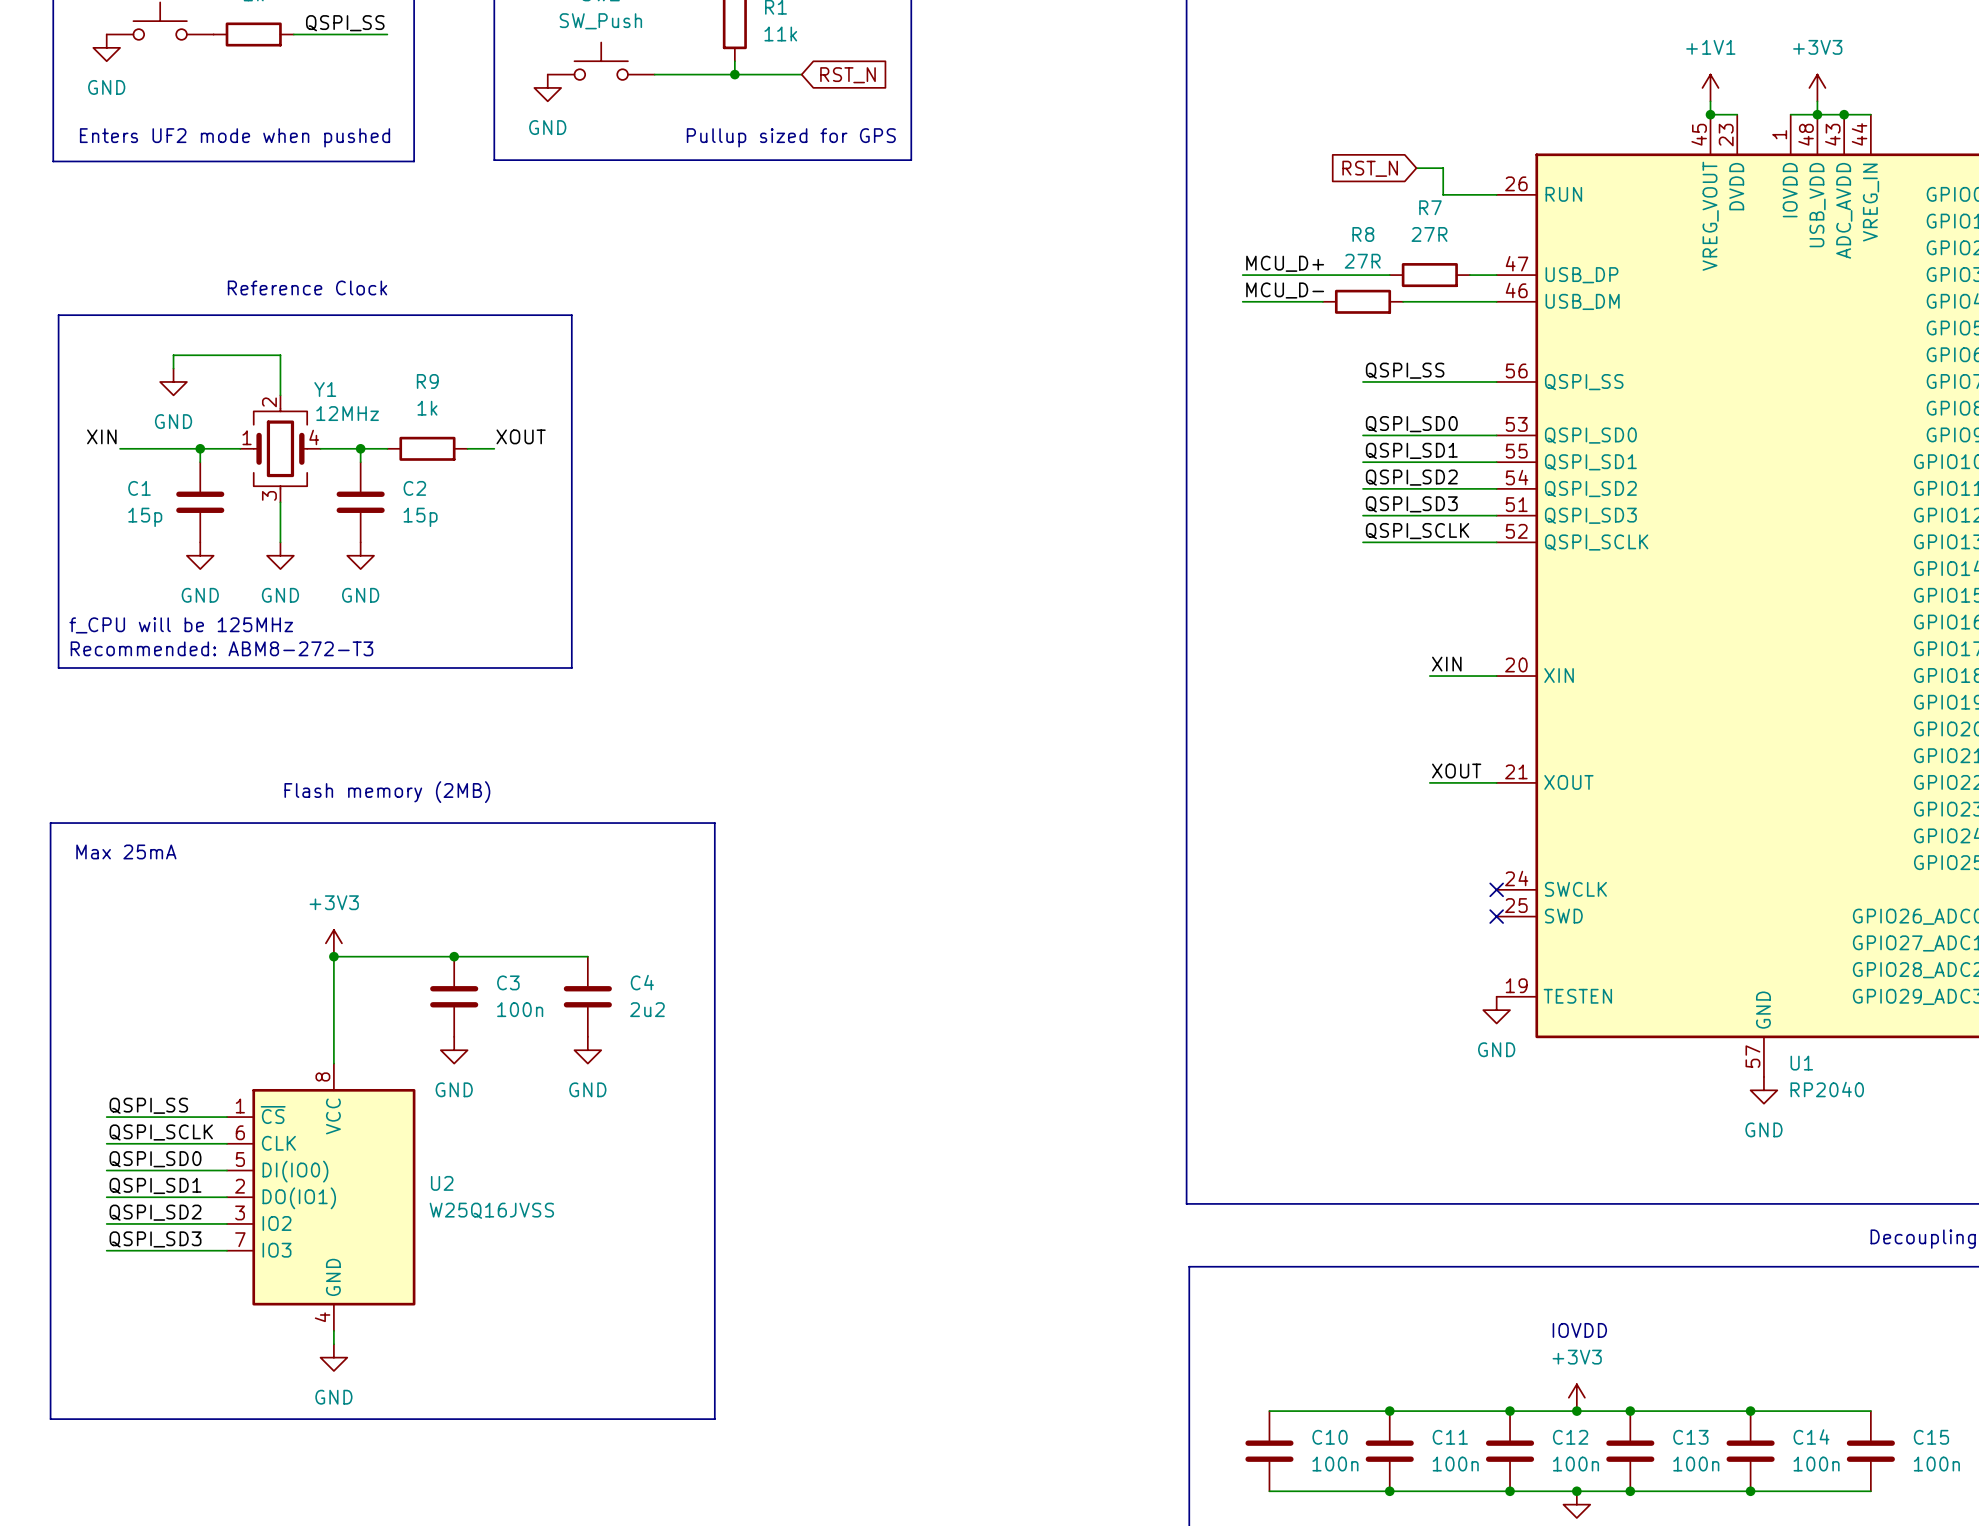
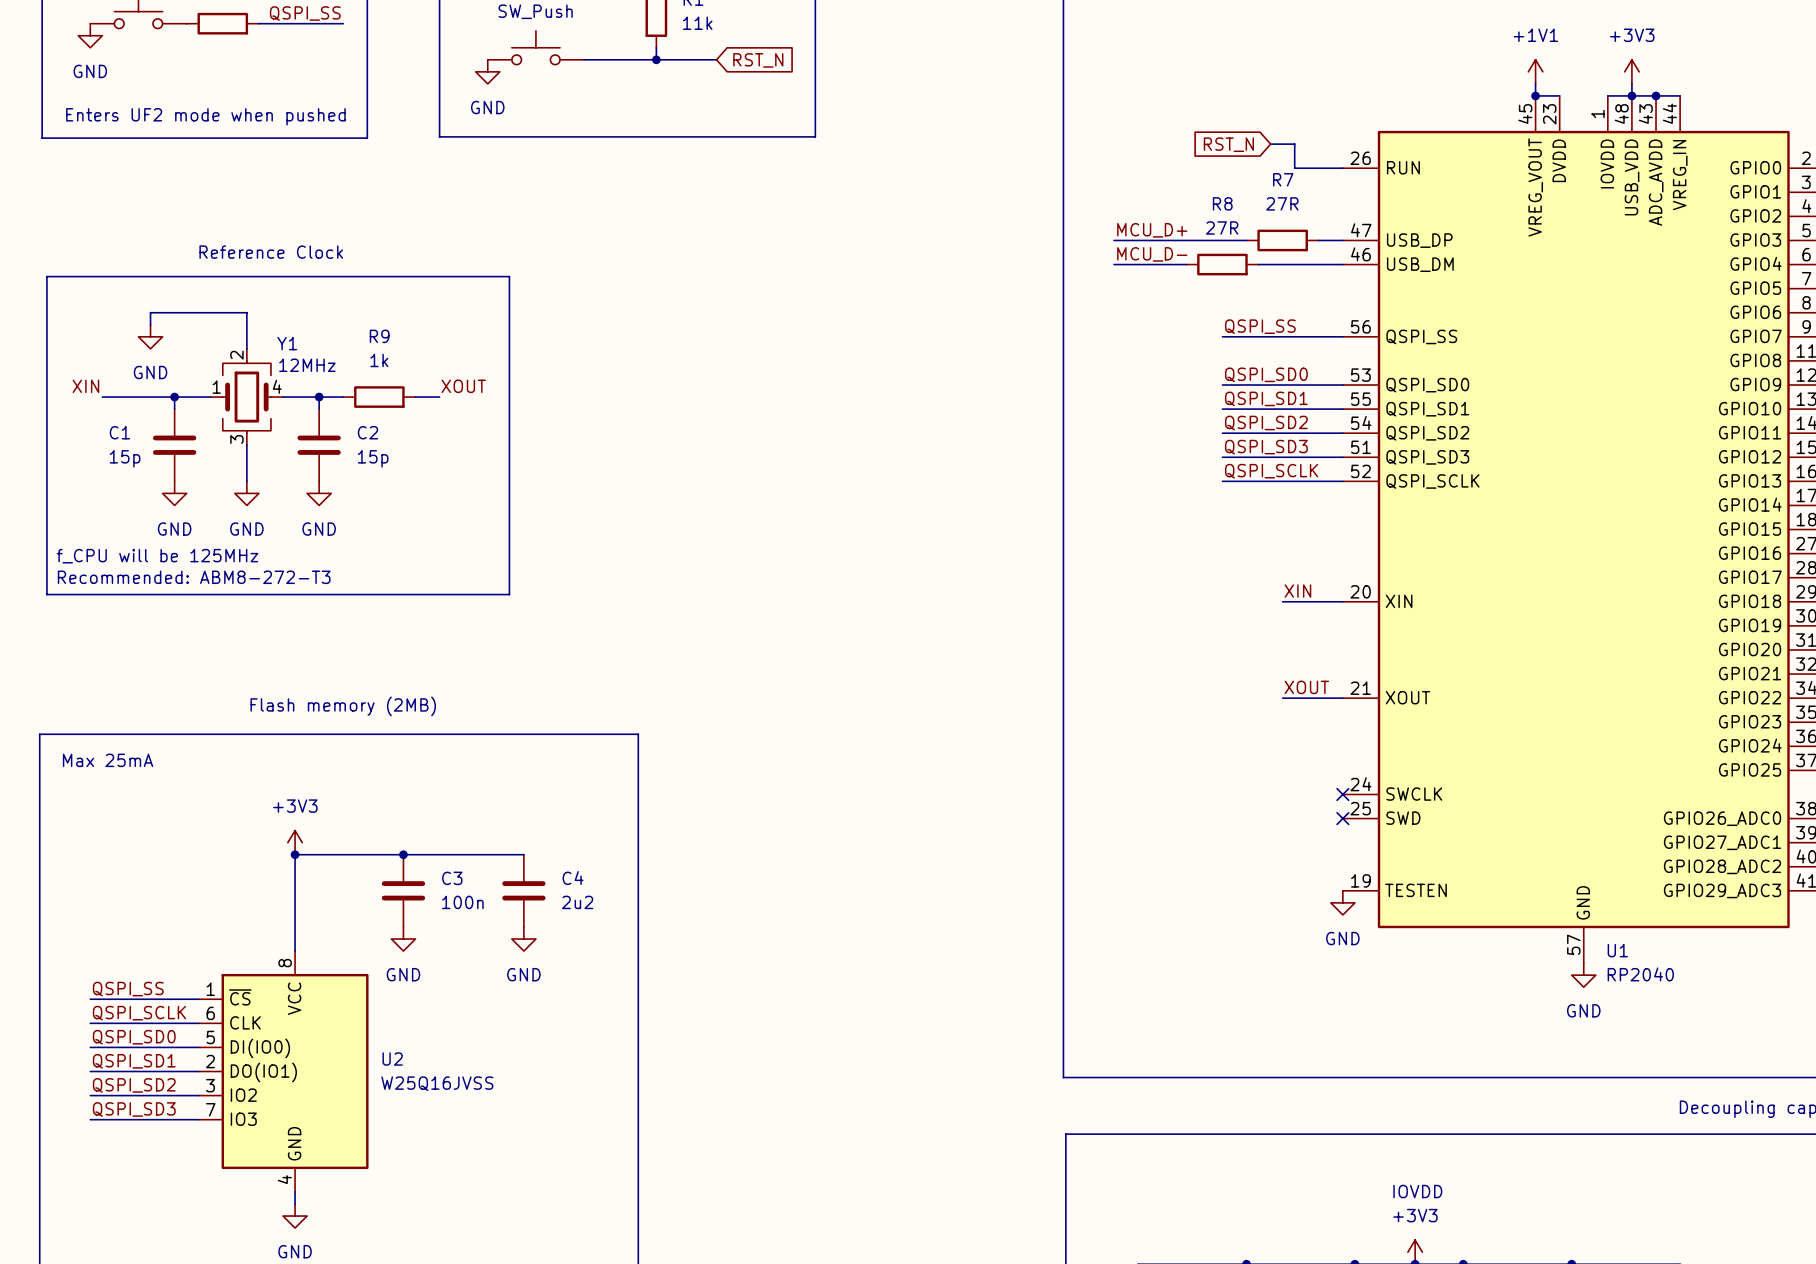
text: Pullup sized for GPS (791, 137) -> none

